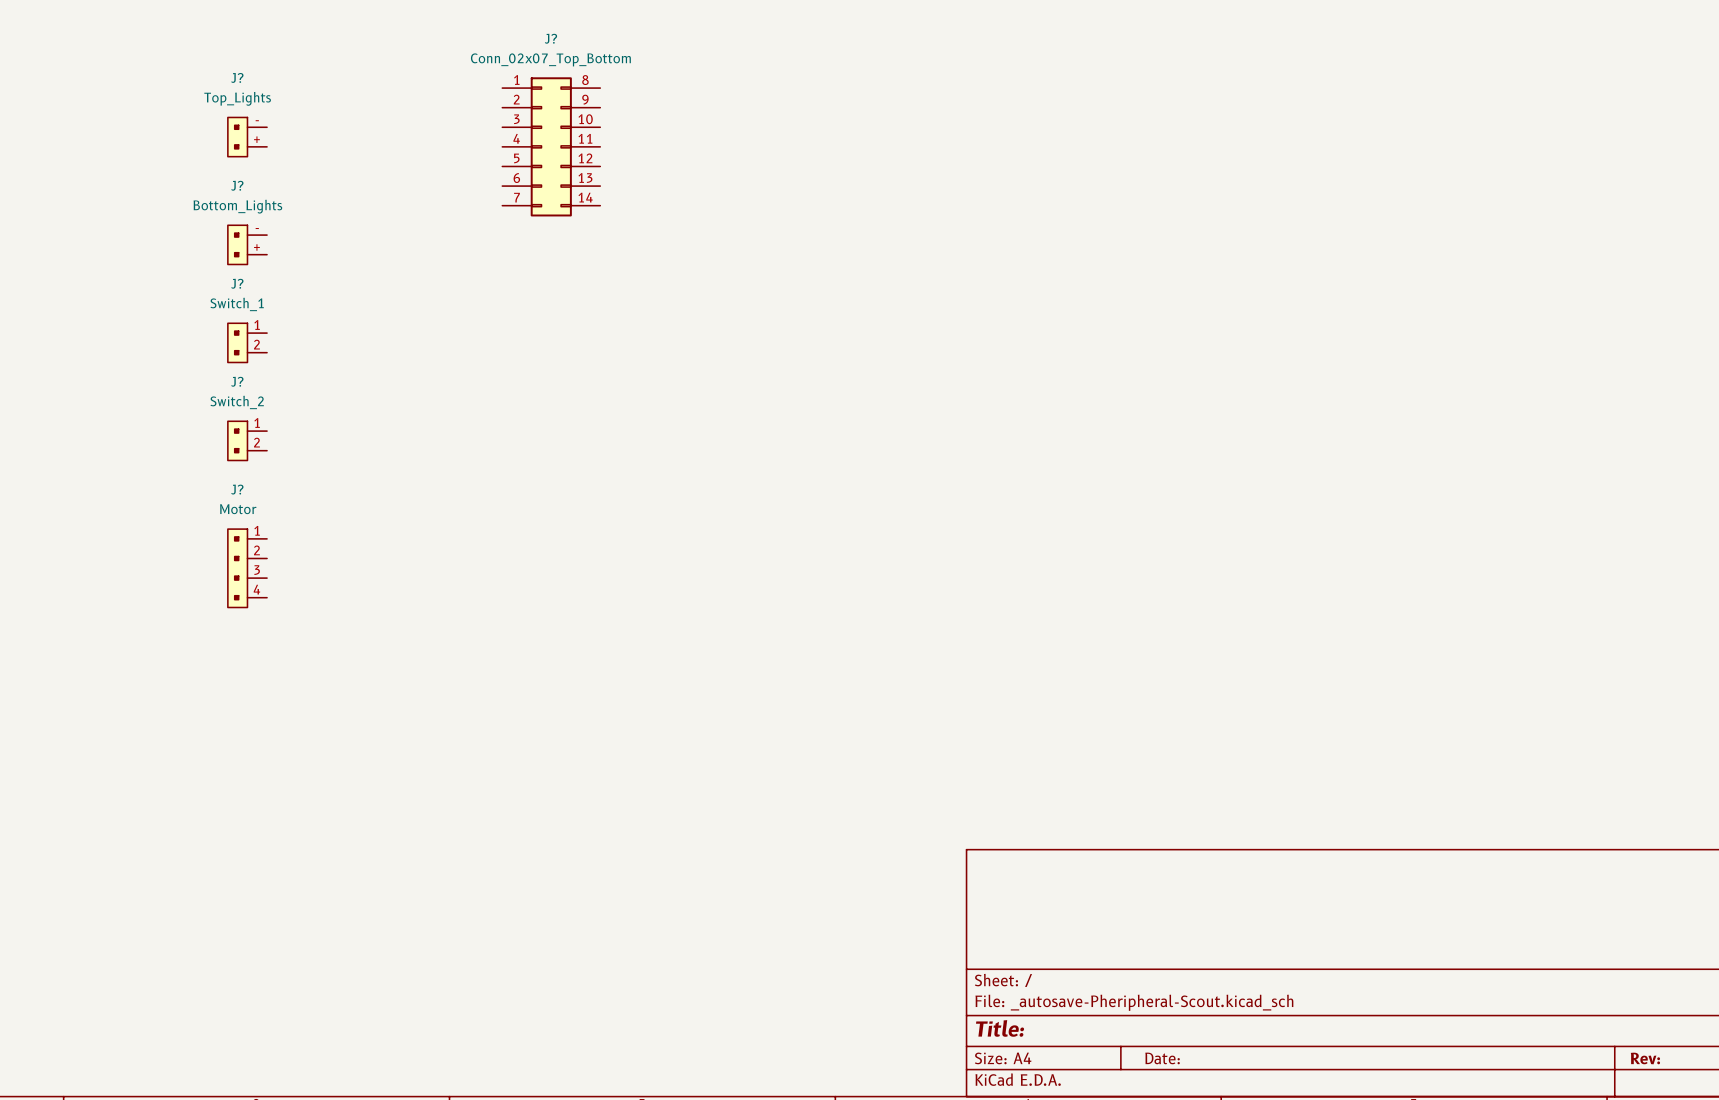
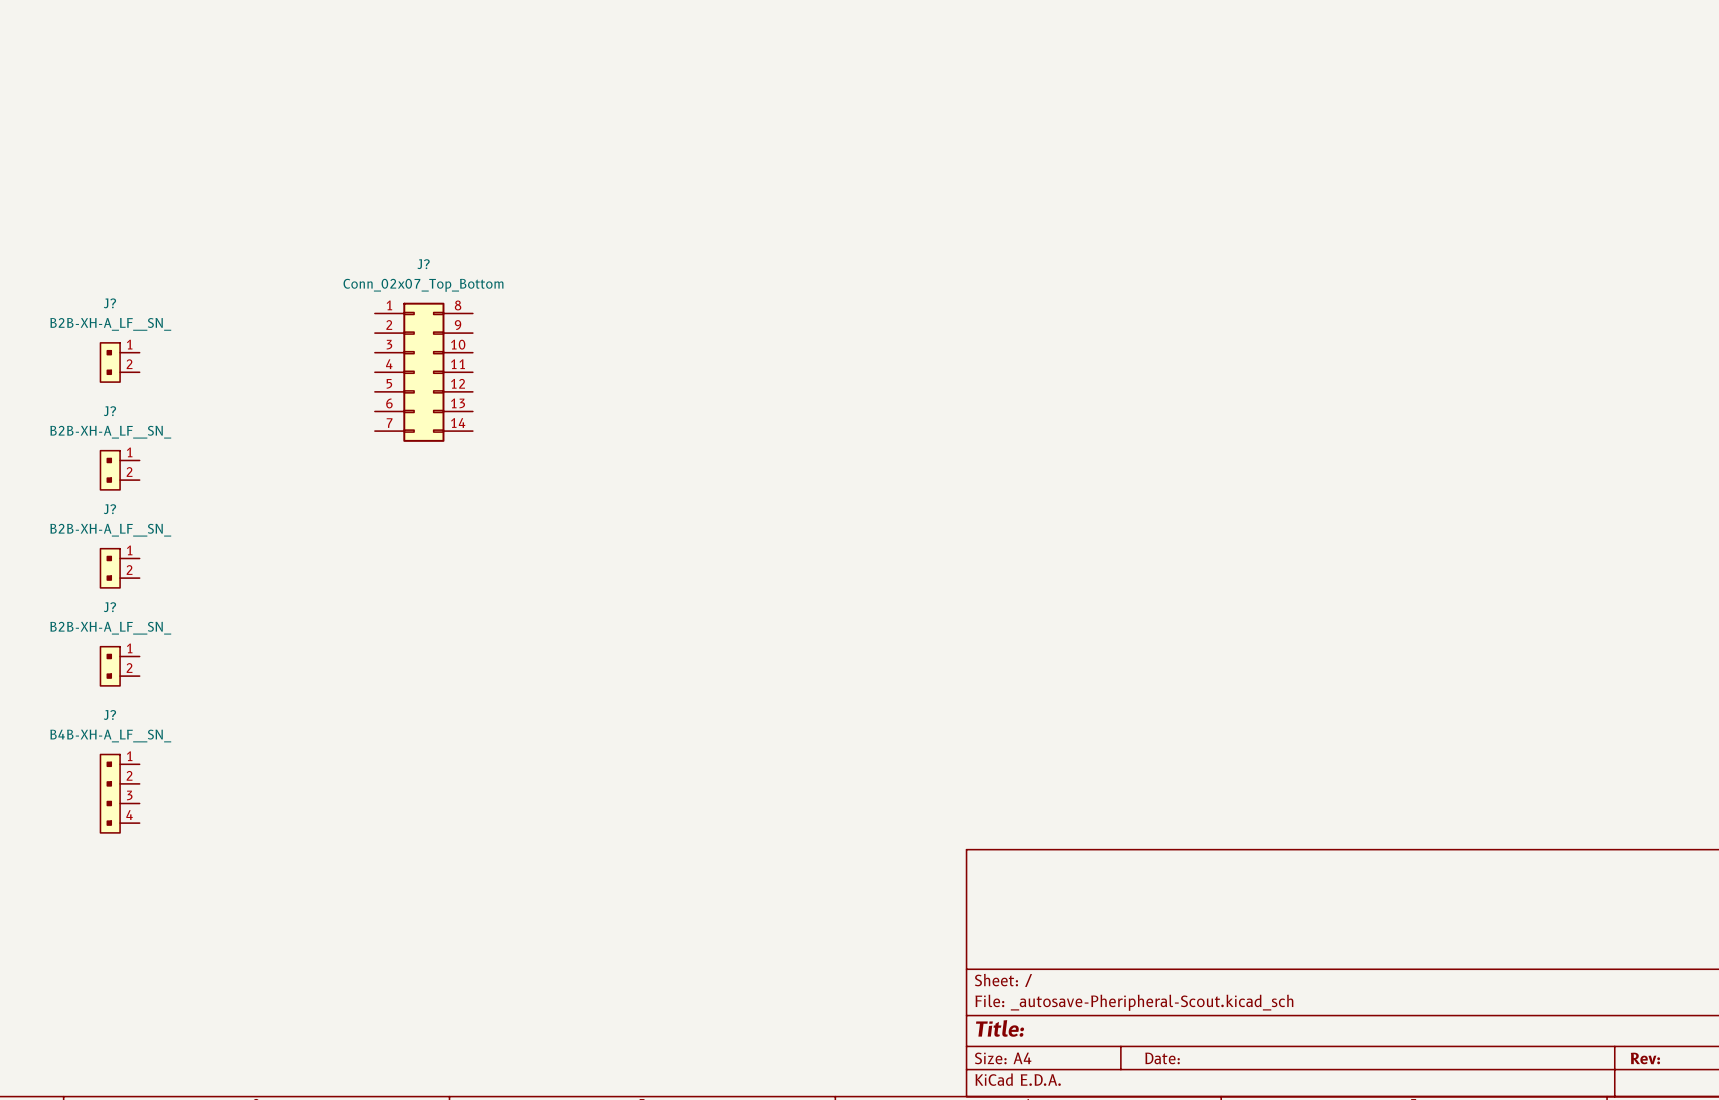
J?: Top_Lights (247, 137) -> none
J?: Conn_02x07_Top_Bottom (551, 146) -> none
J?: Bottom_Lights (247, 244) -> none
J?: Switch_1 (247, 342) -> none
J?: none -> B2B-XH-A_LF__SN_ (120, 362)
J?: none -> Conn_02x07_Top_Bottom (423, 372)
J?: Switch_2 (247, 440) -> none
J?: none -> B2B-XH-A_LF__SN_ (120, 470)
J?: none -> B2B-XH-A_LF__SN_ (120, 568)
J?: Motor (247, 568) -> none
J?: none -> B2B-XH-A_LF__SN_ (120, 666)
J?: none -> B4B-XH-A_LF__SN_ (120, 793)

